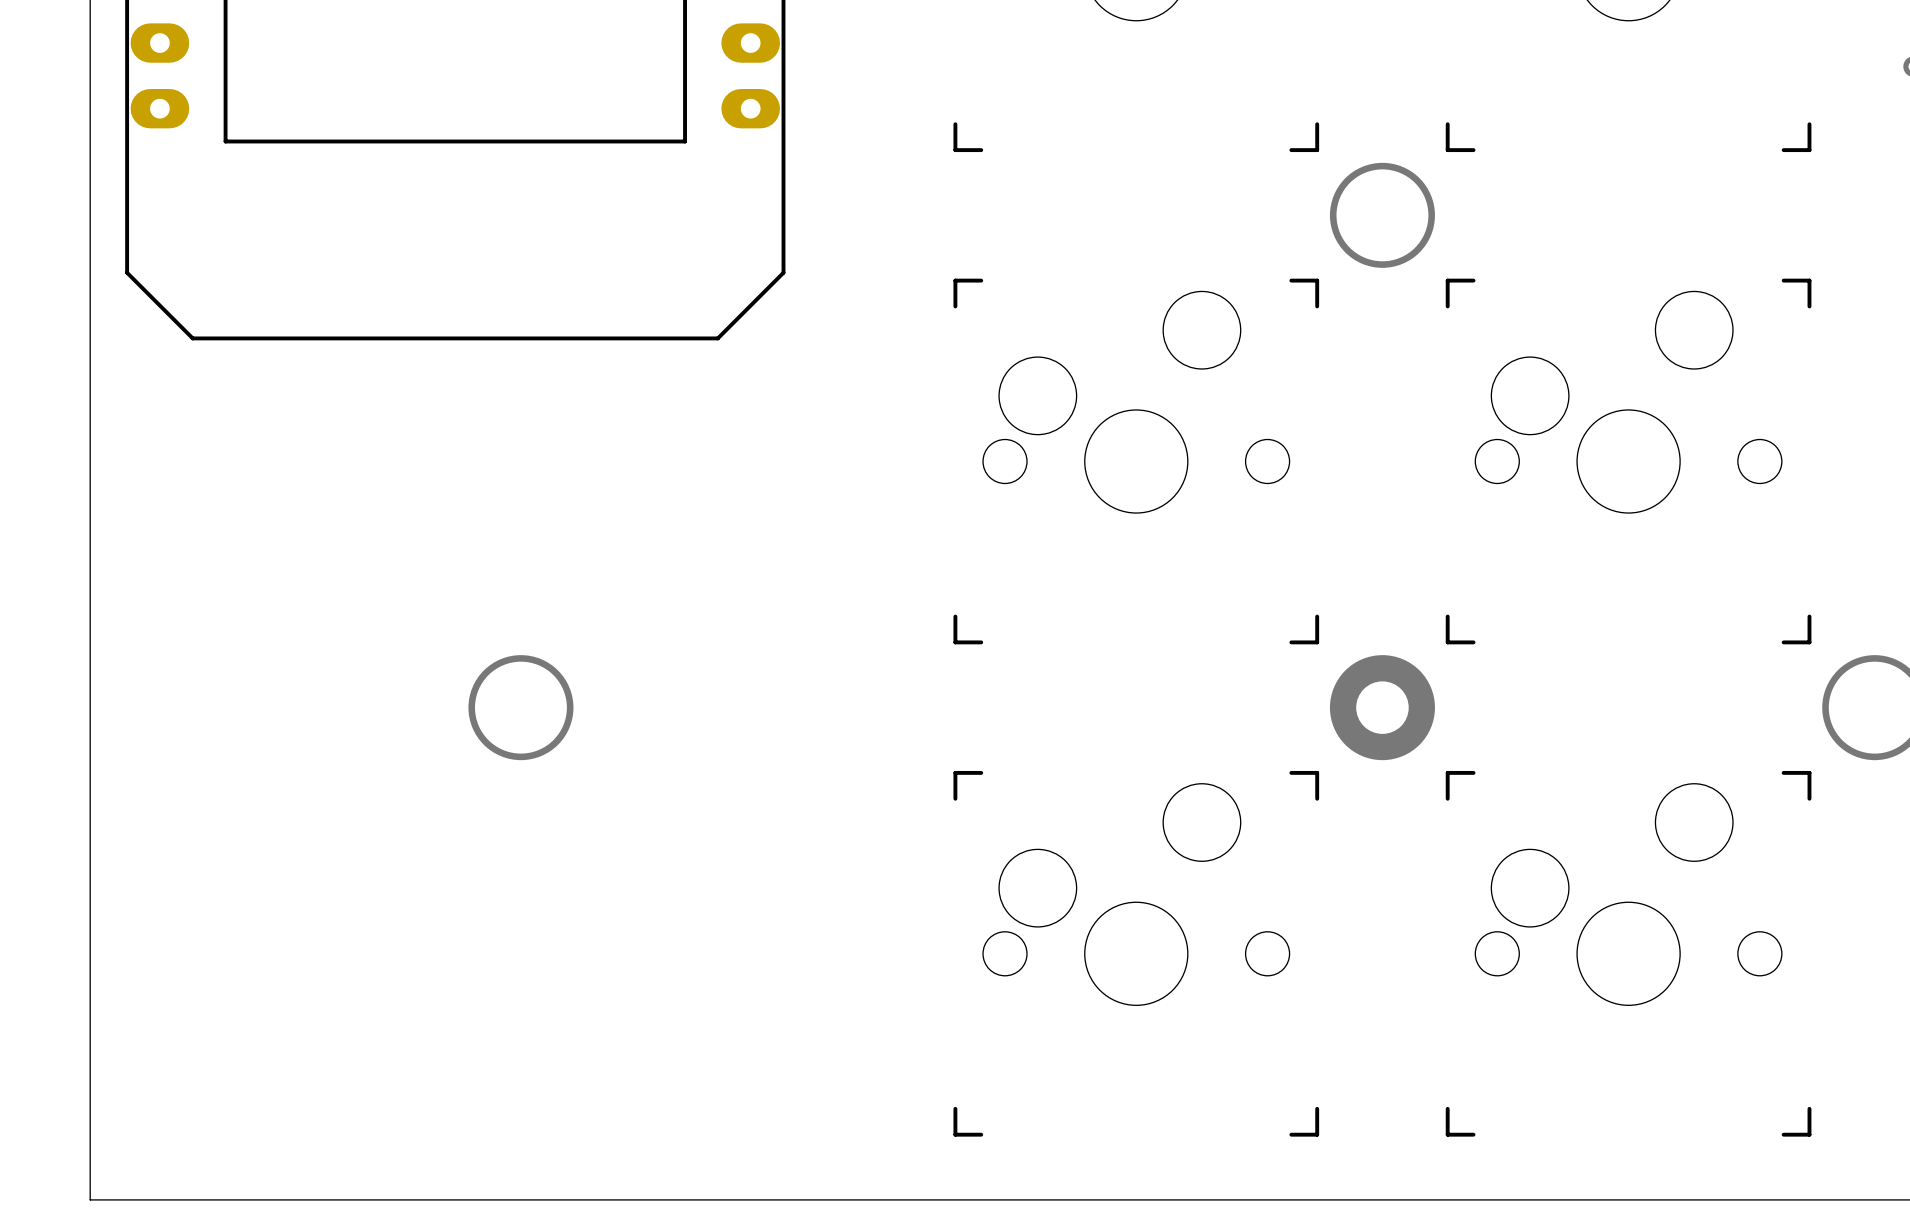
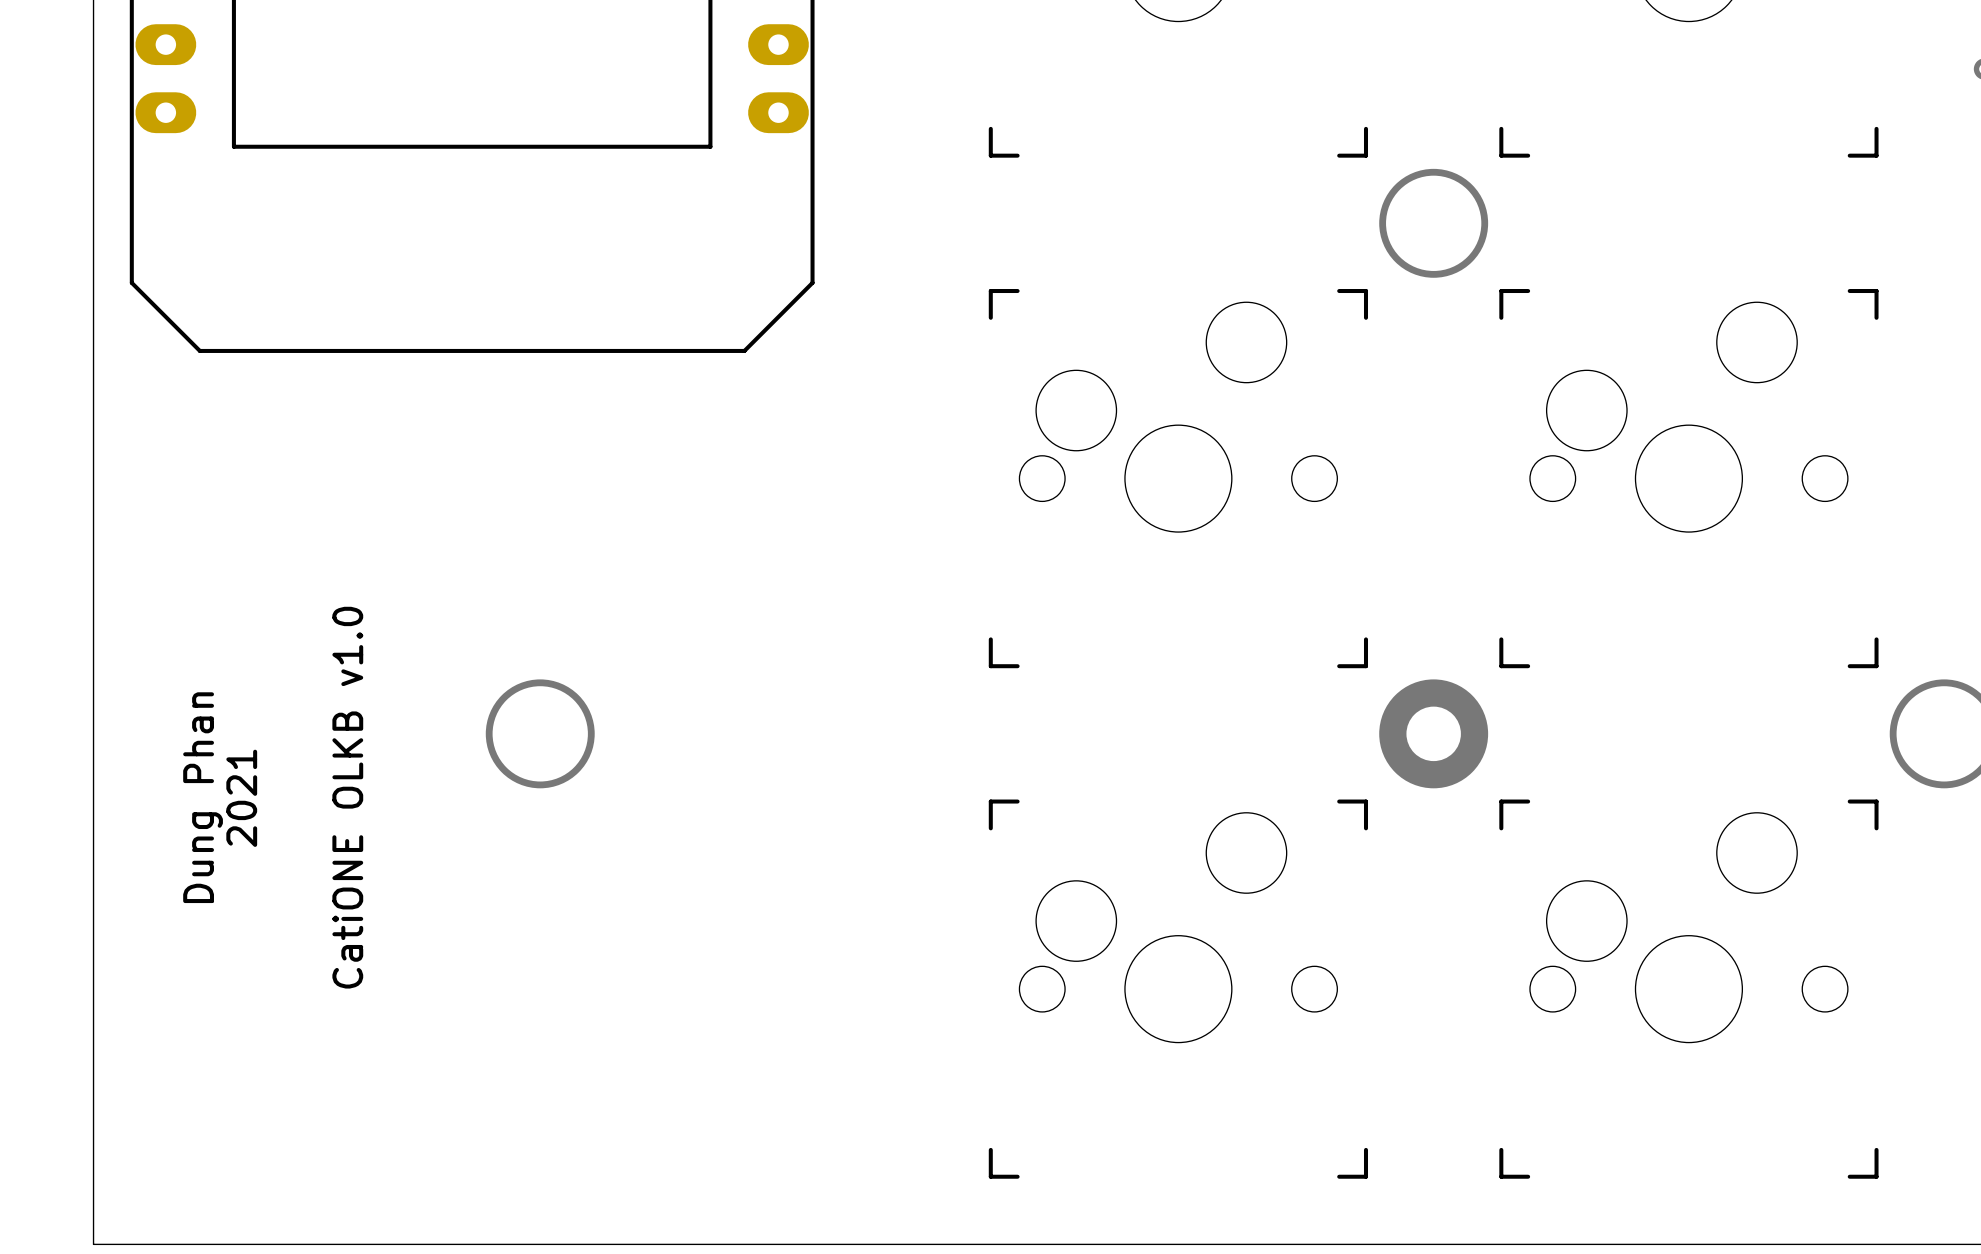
text: none -> Dung Phan (203, 797)
text: none -> 2021 (241, 798)
text: none -> CatiONE OLKB v1.0 (347, 797)

